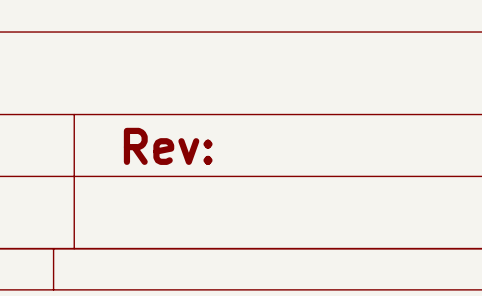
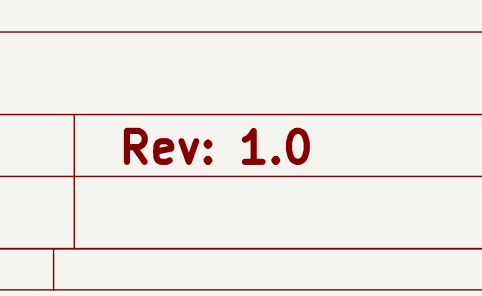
title block: Rev: (168, 146) -> Rev: 1.0 (216, 146)

